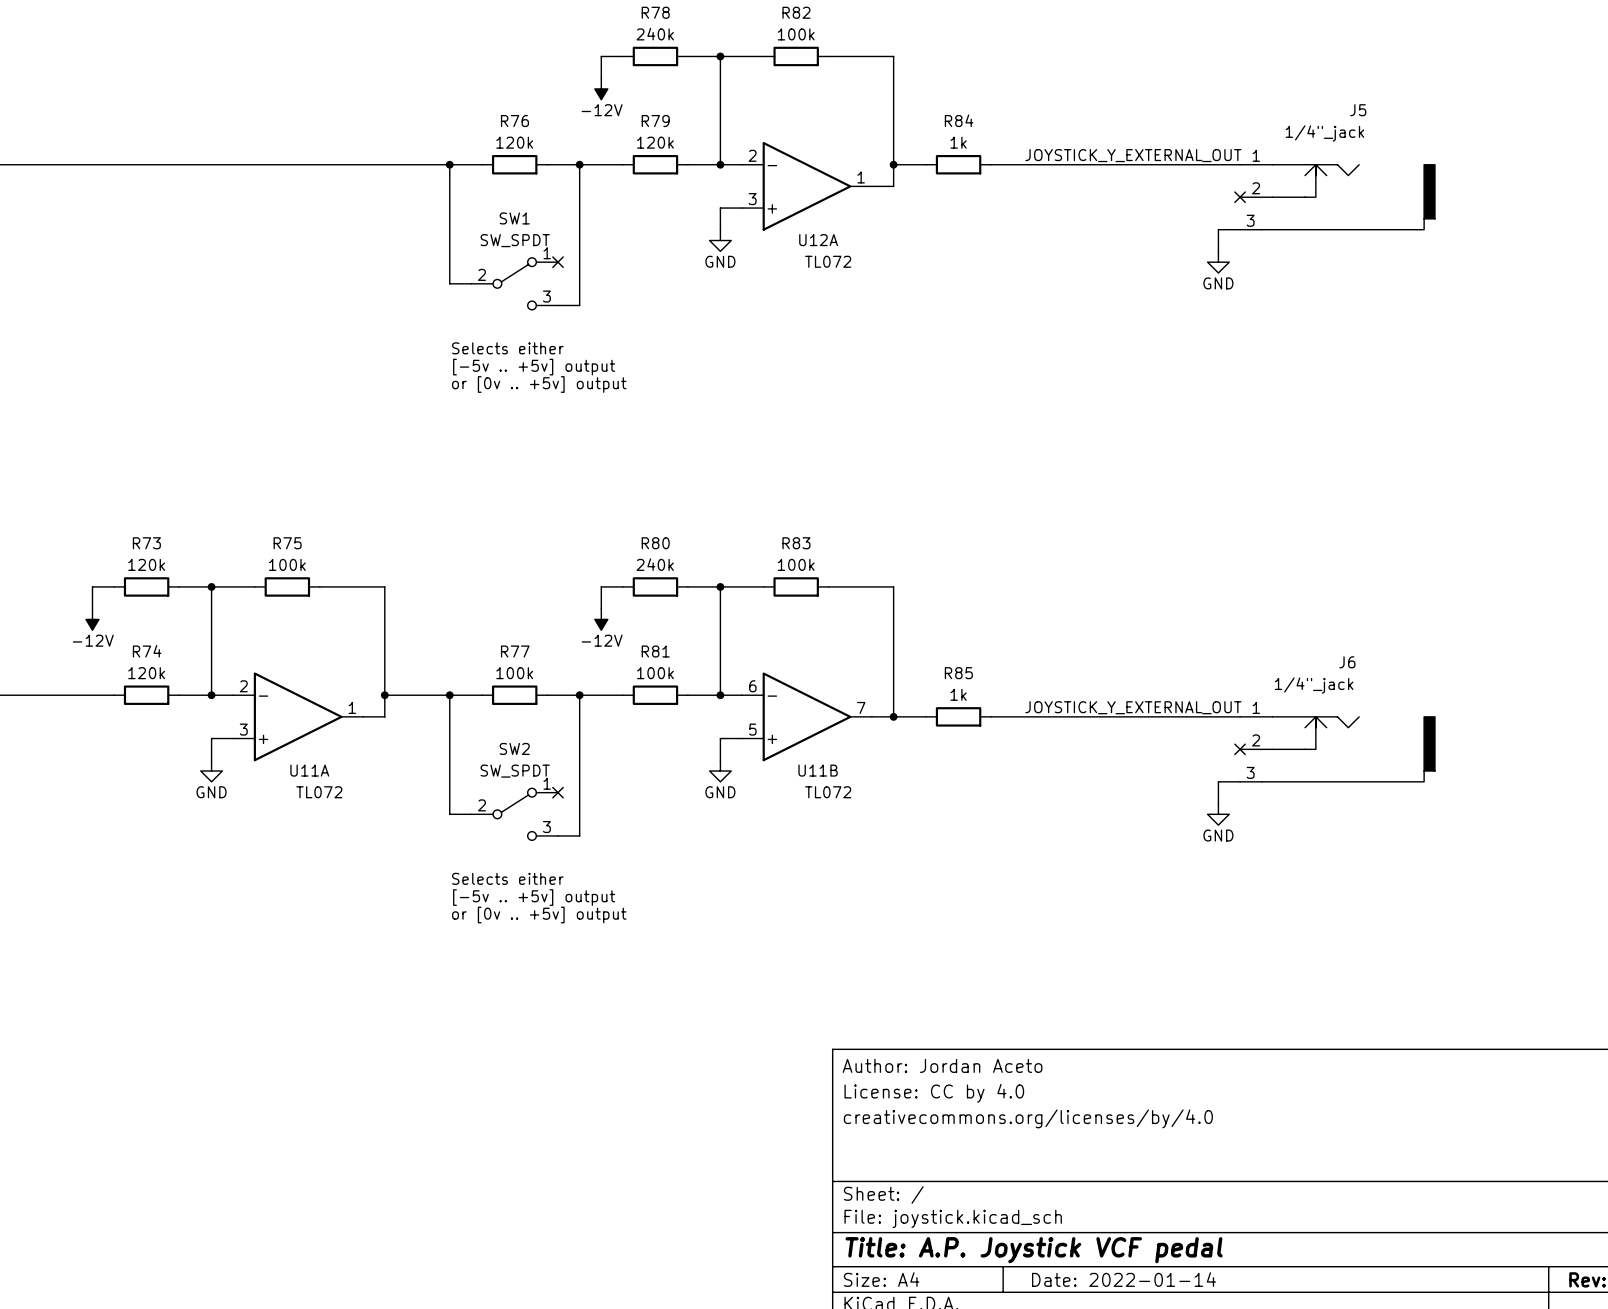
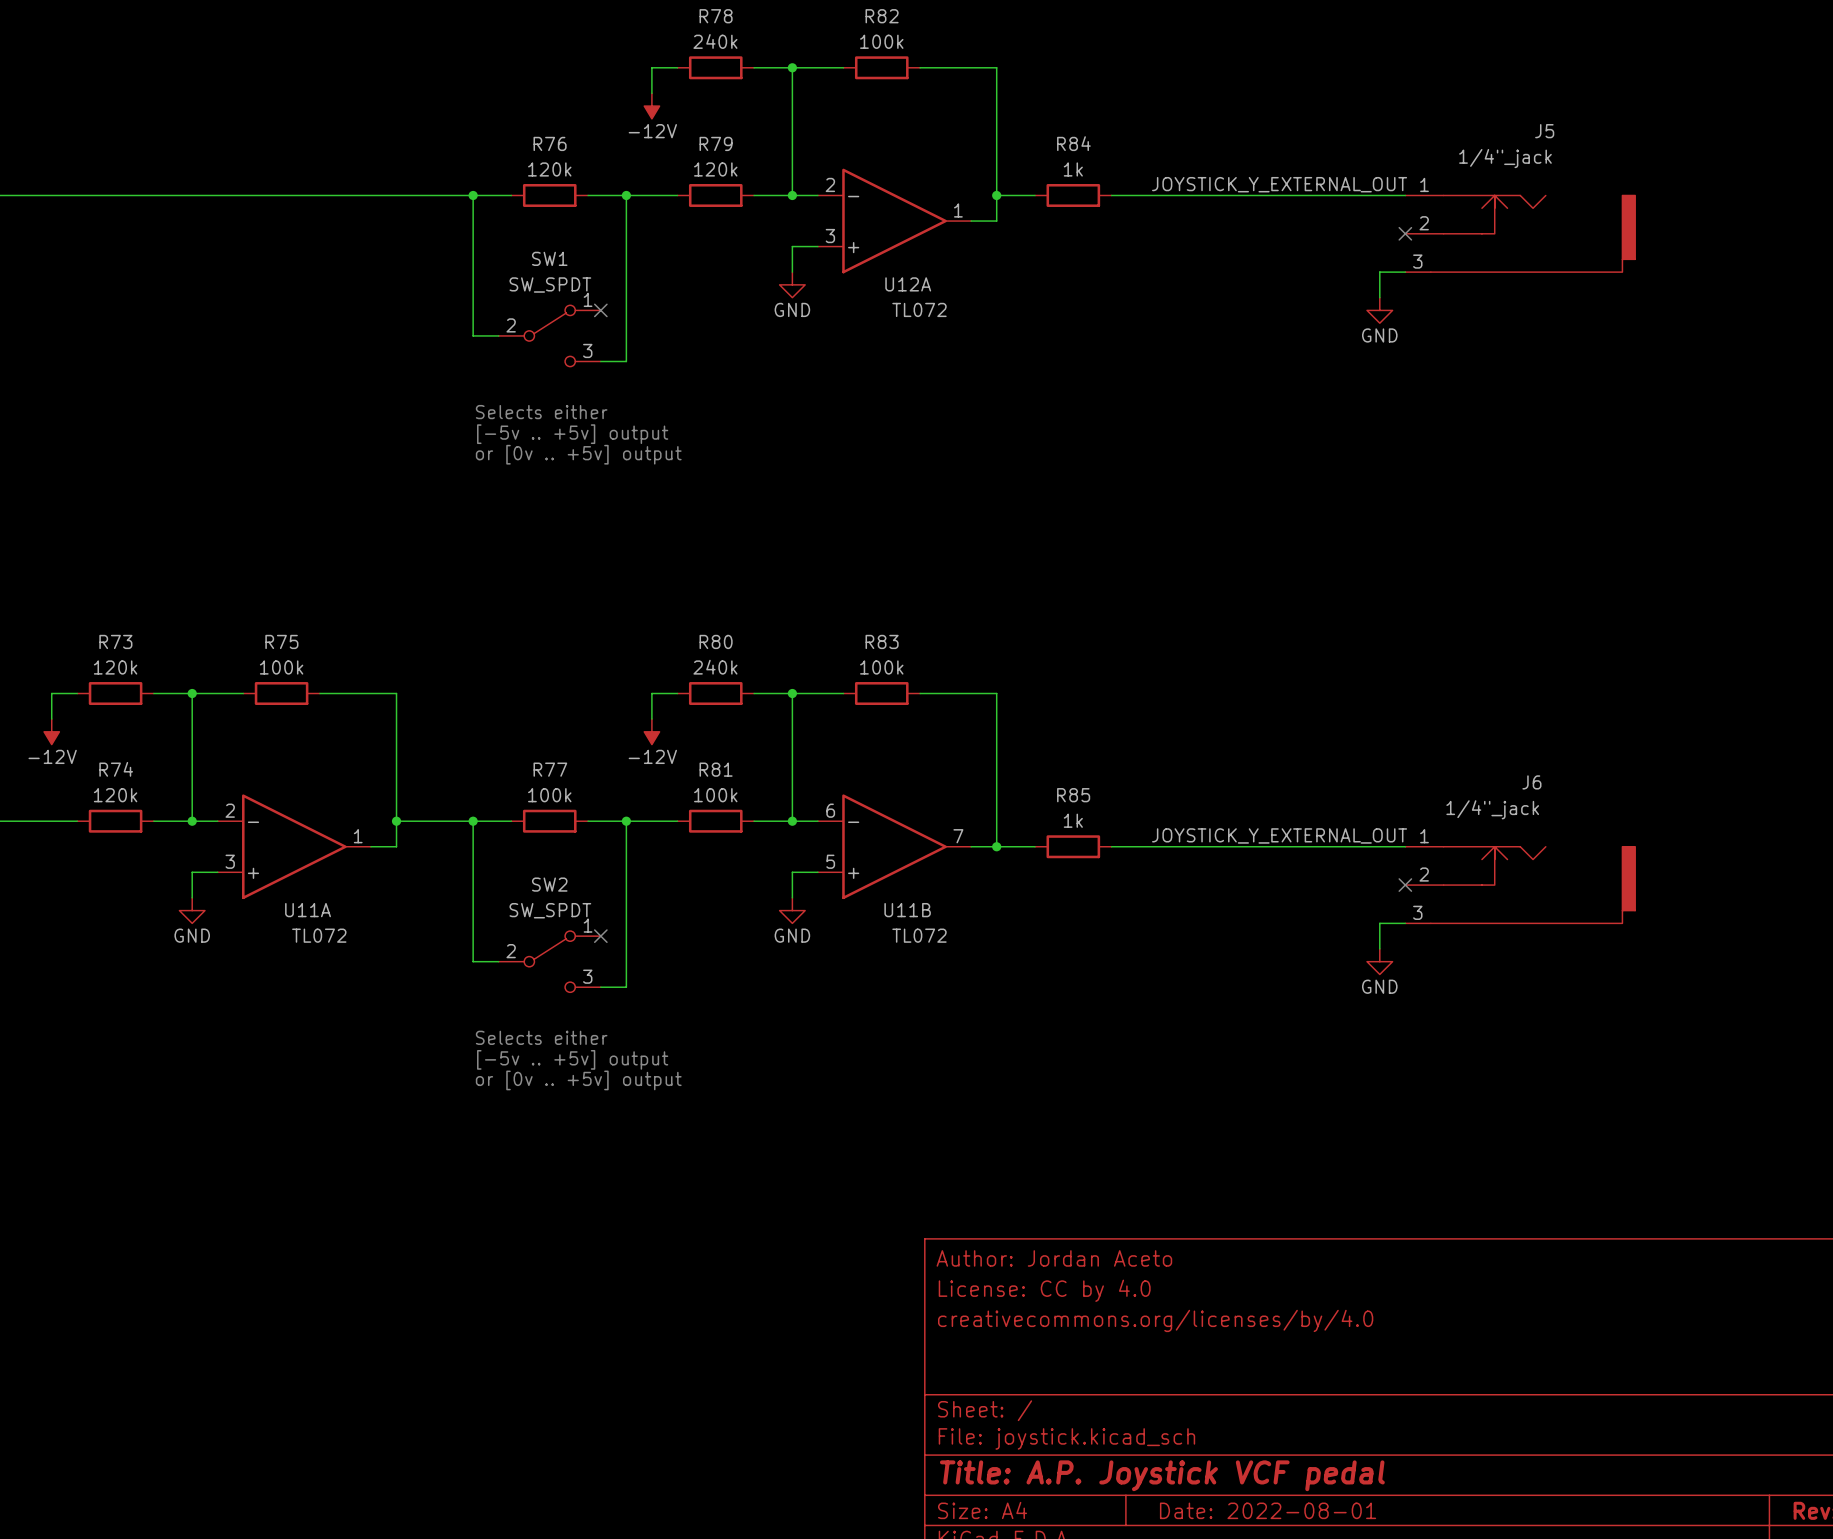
title block: Date: 2022-01-14 (1123, 1279) -> Date: 2022-08-01 (1268, 1510)

